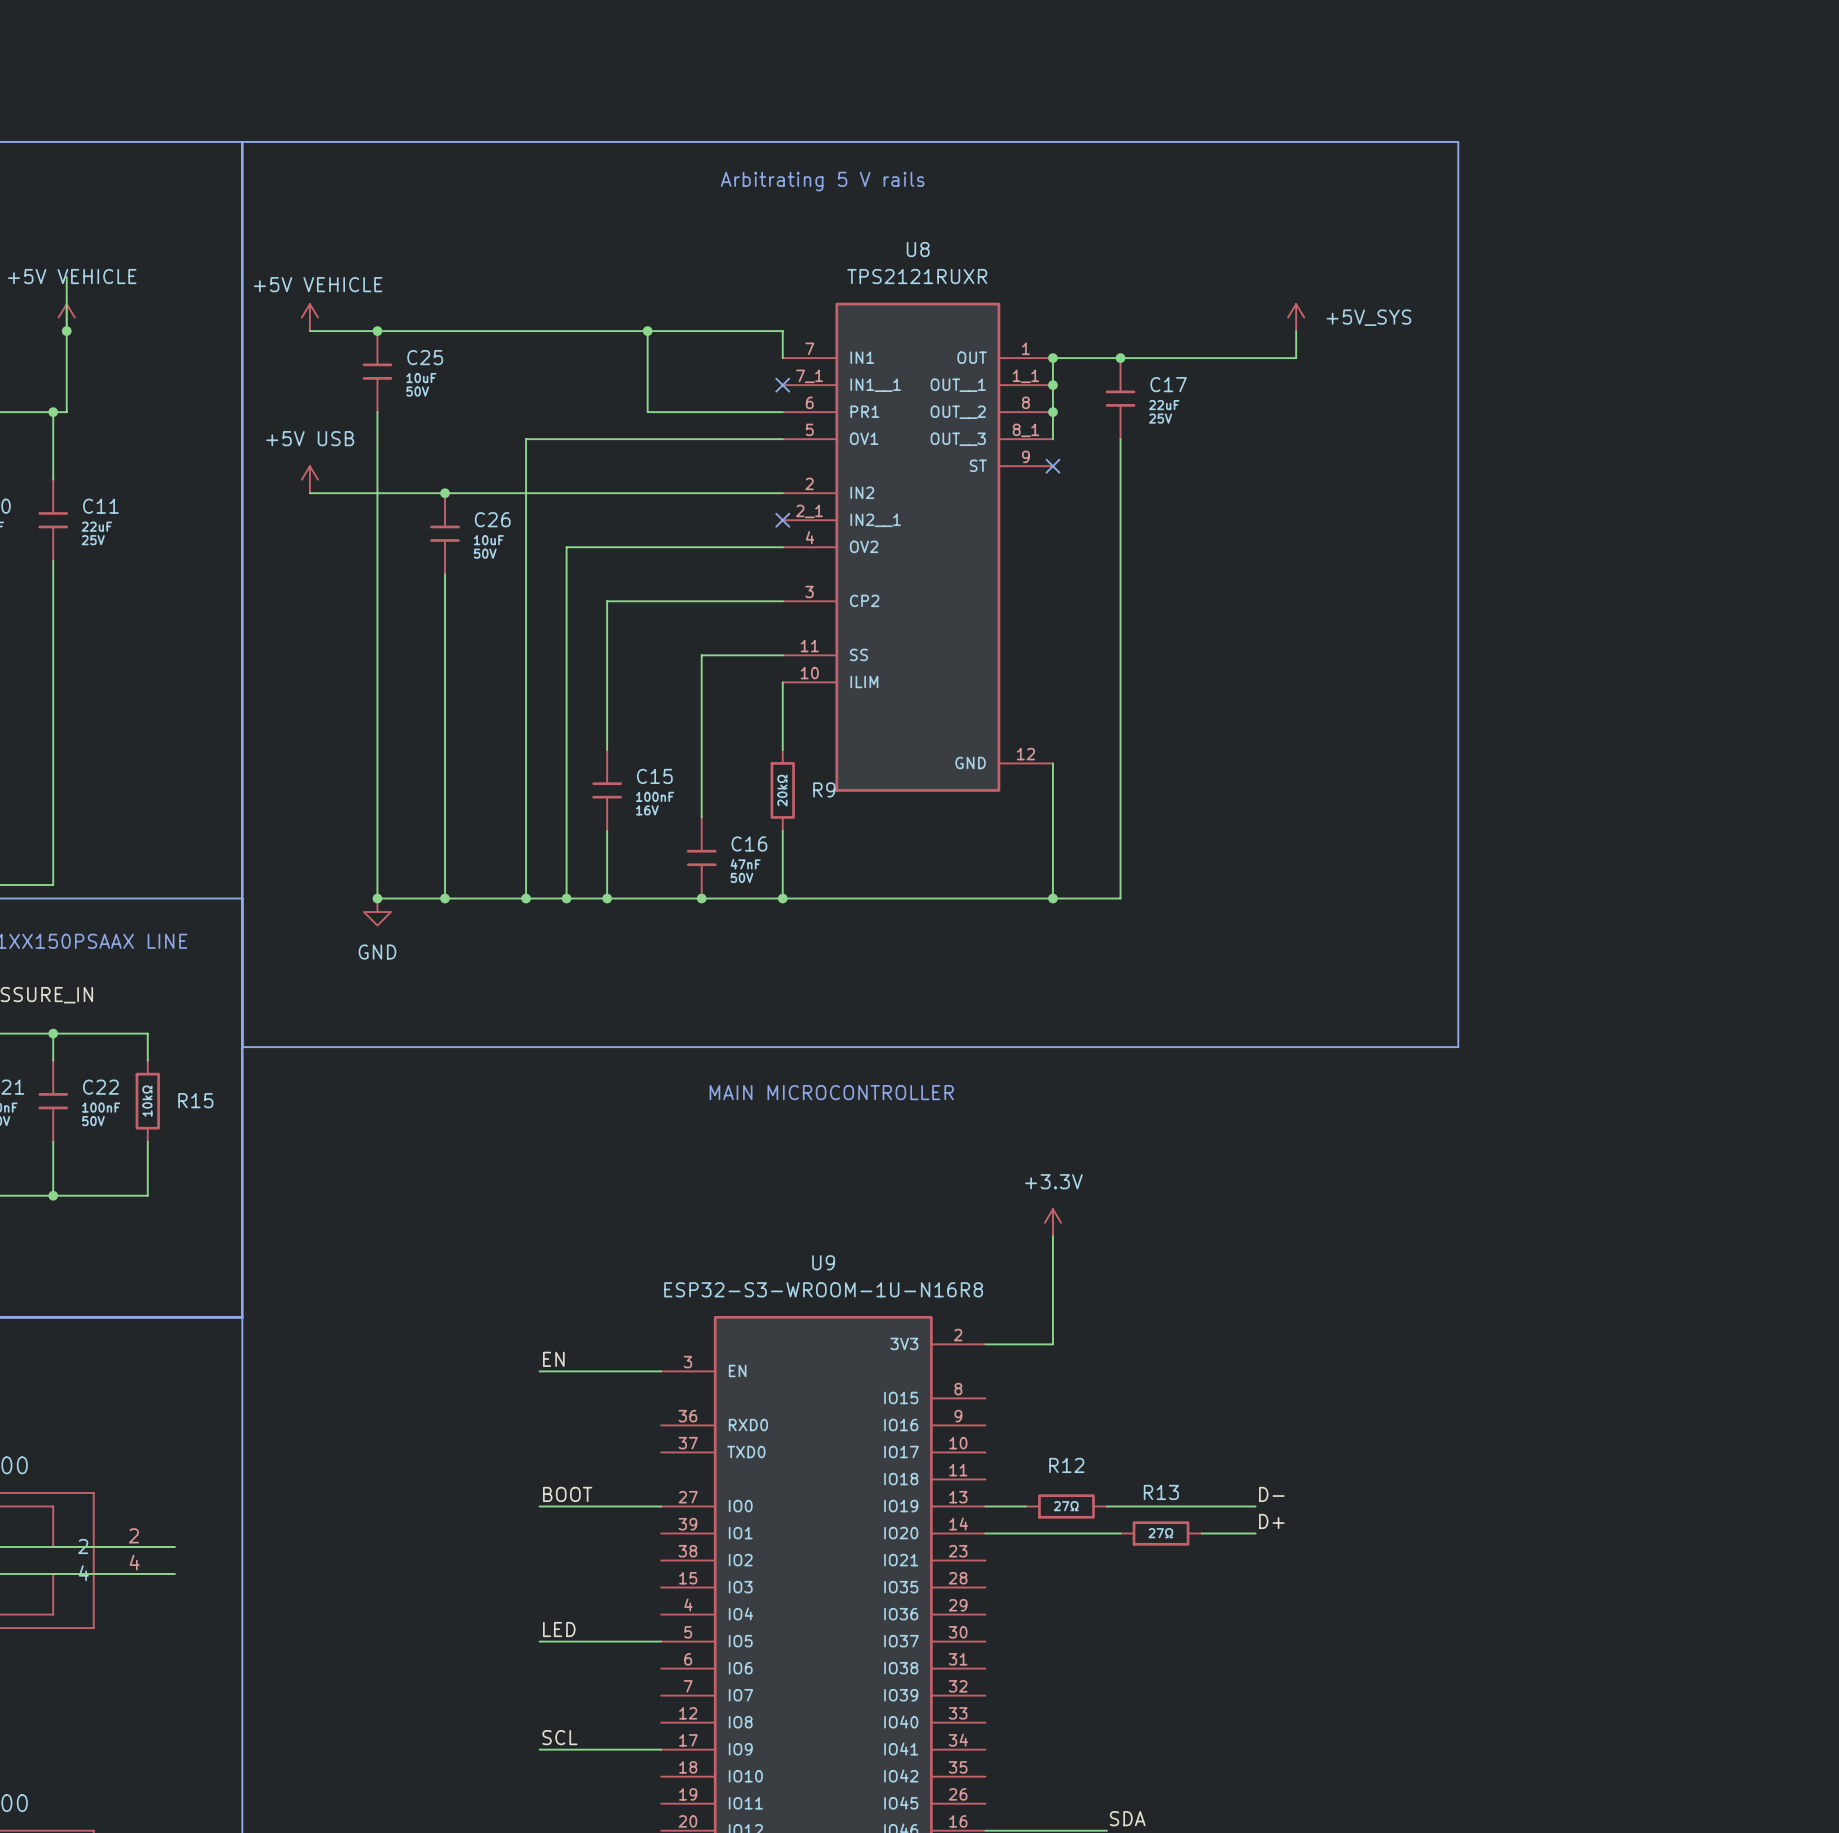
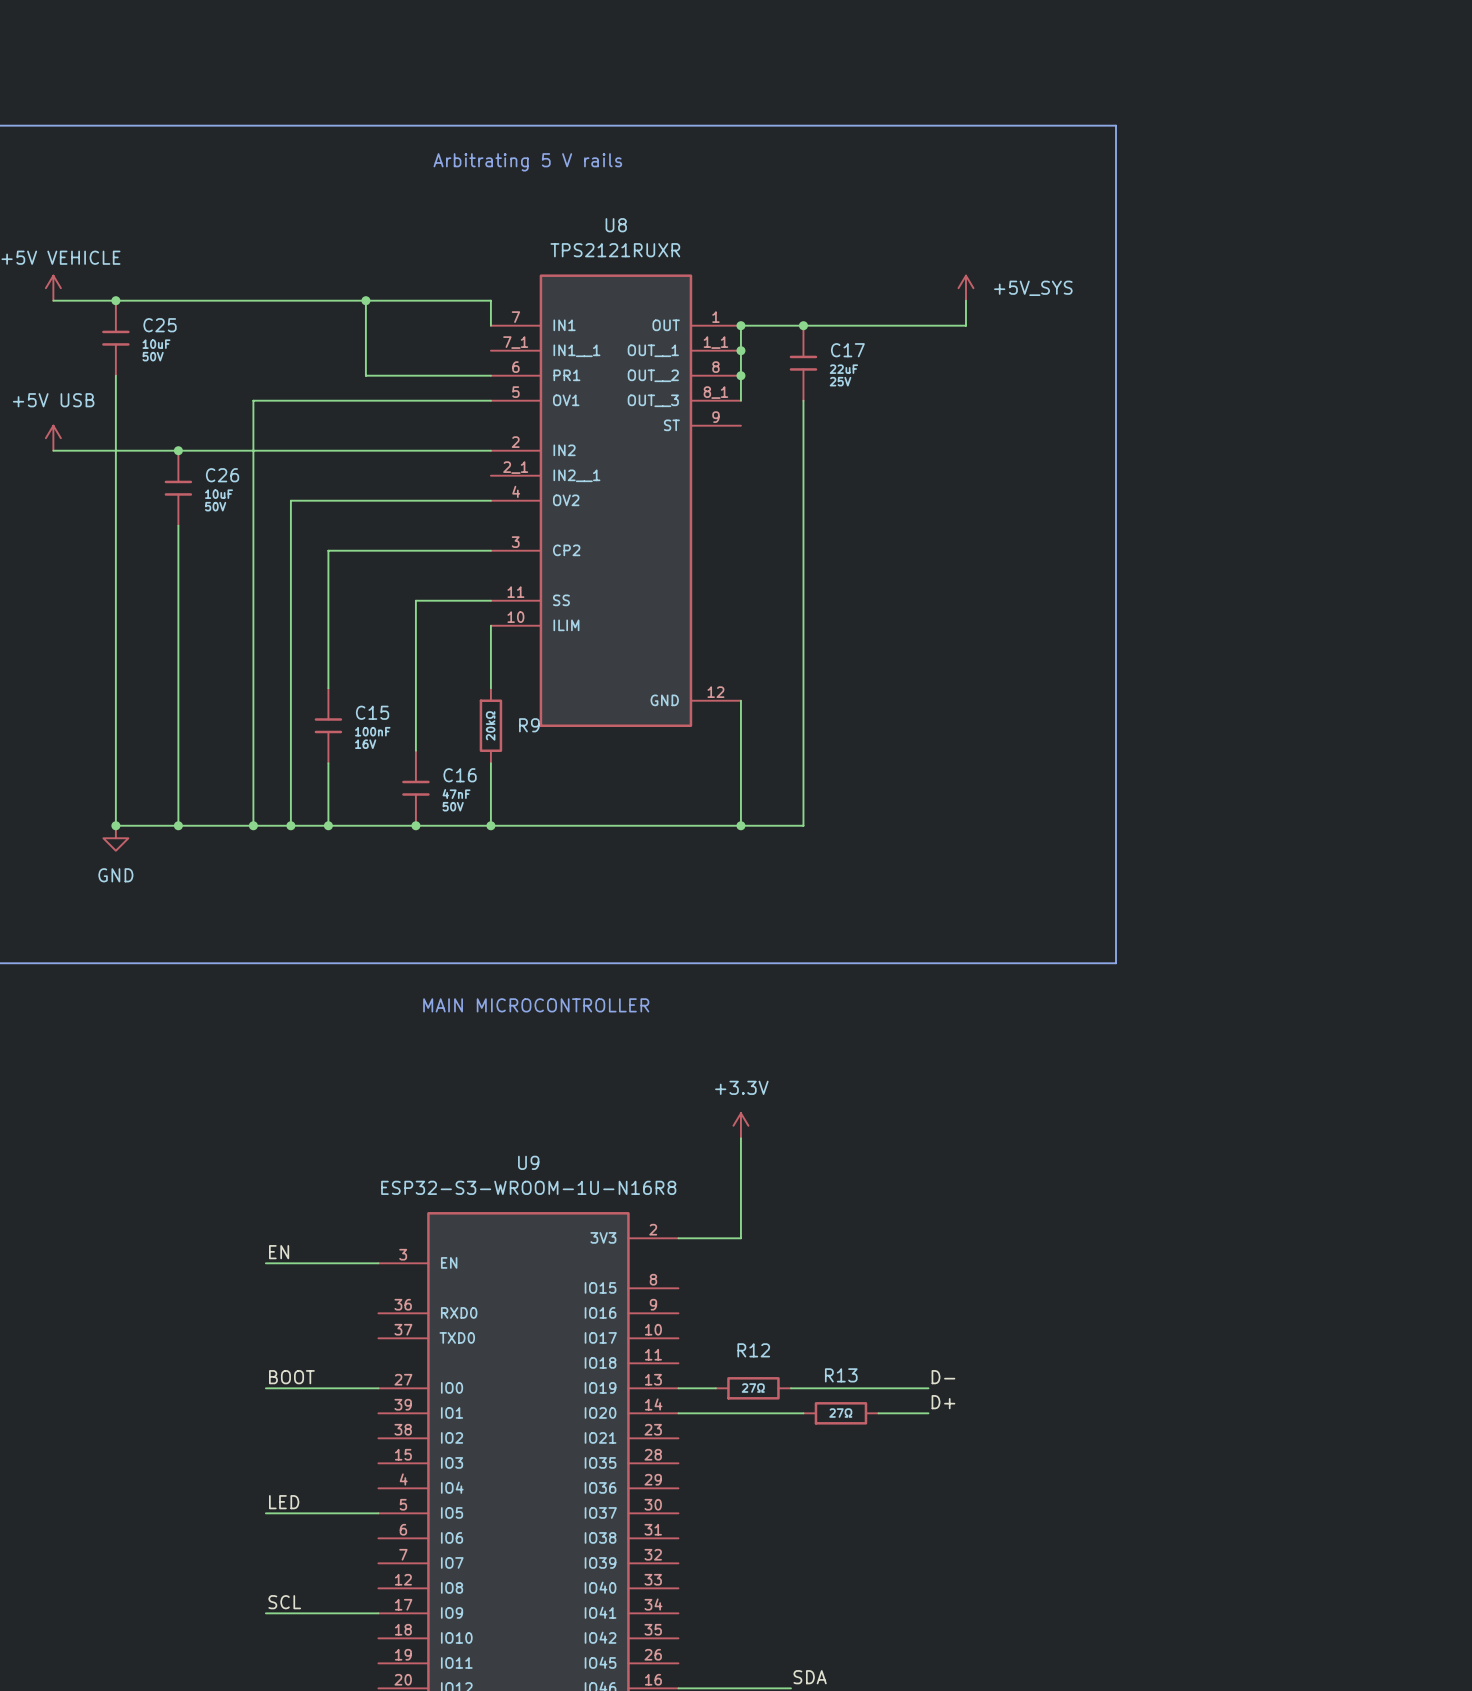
no-connect mark: (782, 385) -> none
no-connect mark: (1052, 466) -> none
no-connect mark: (782, 520) -> none

